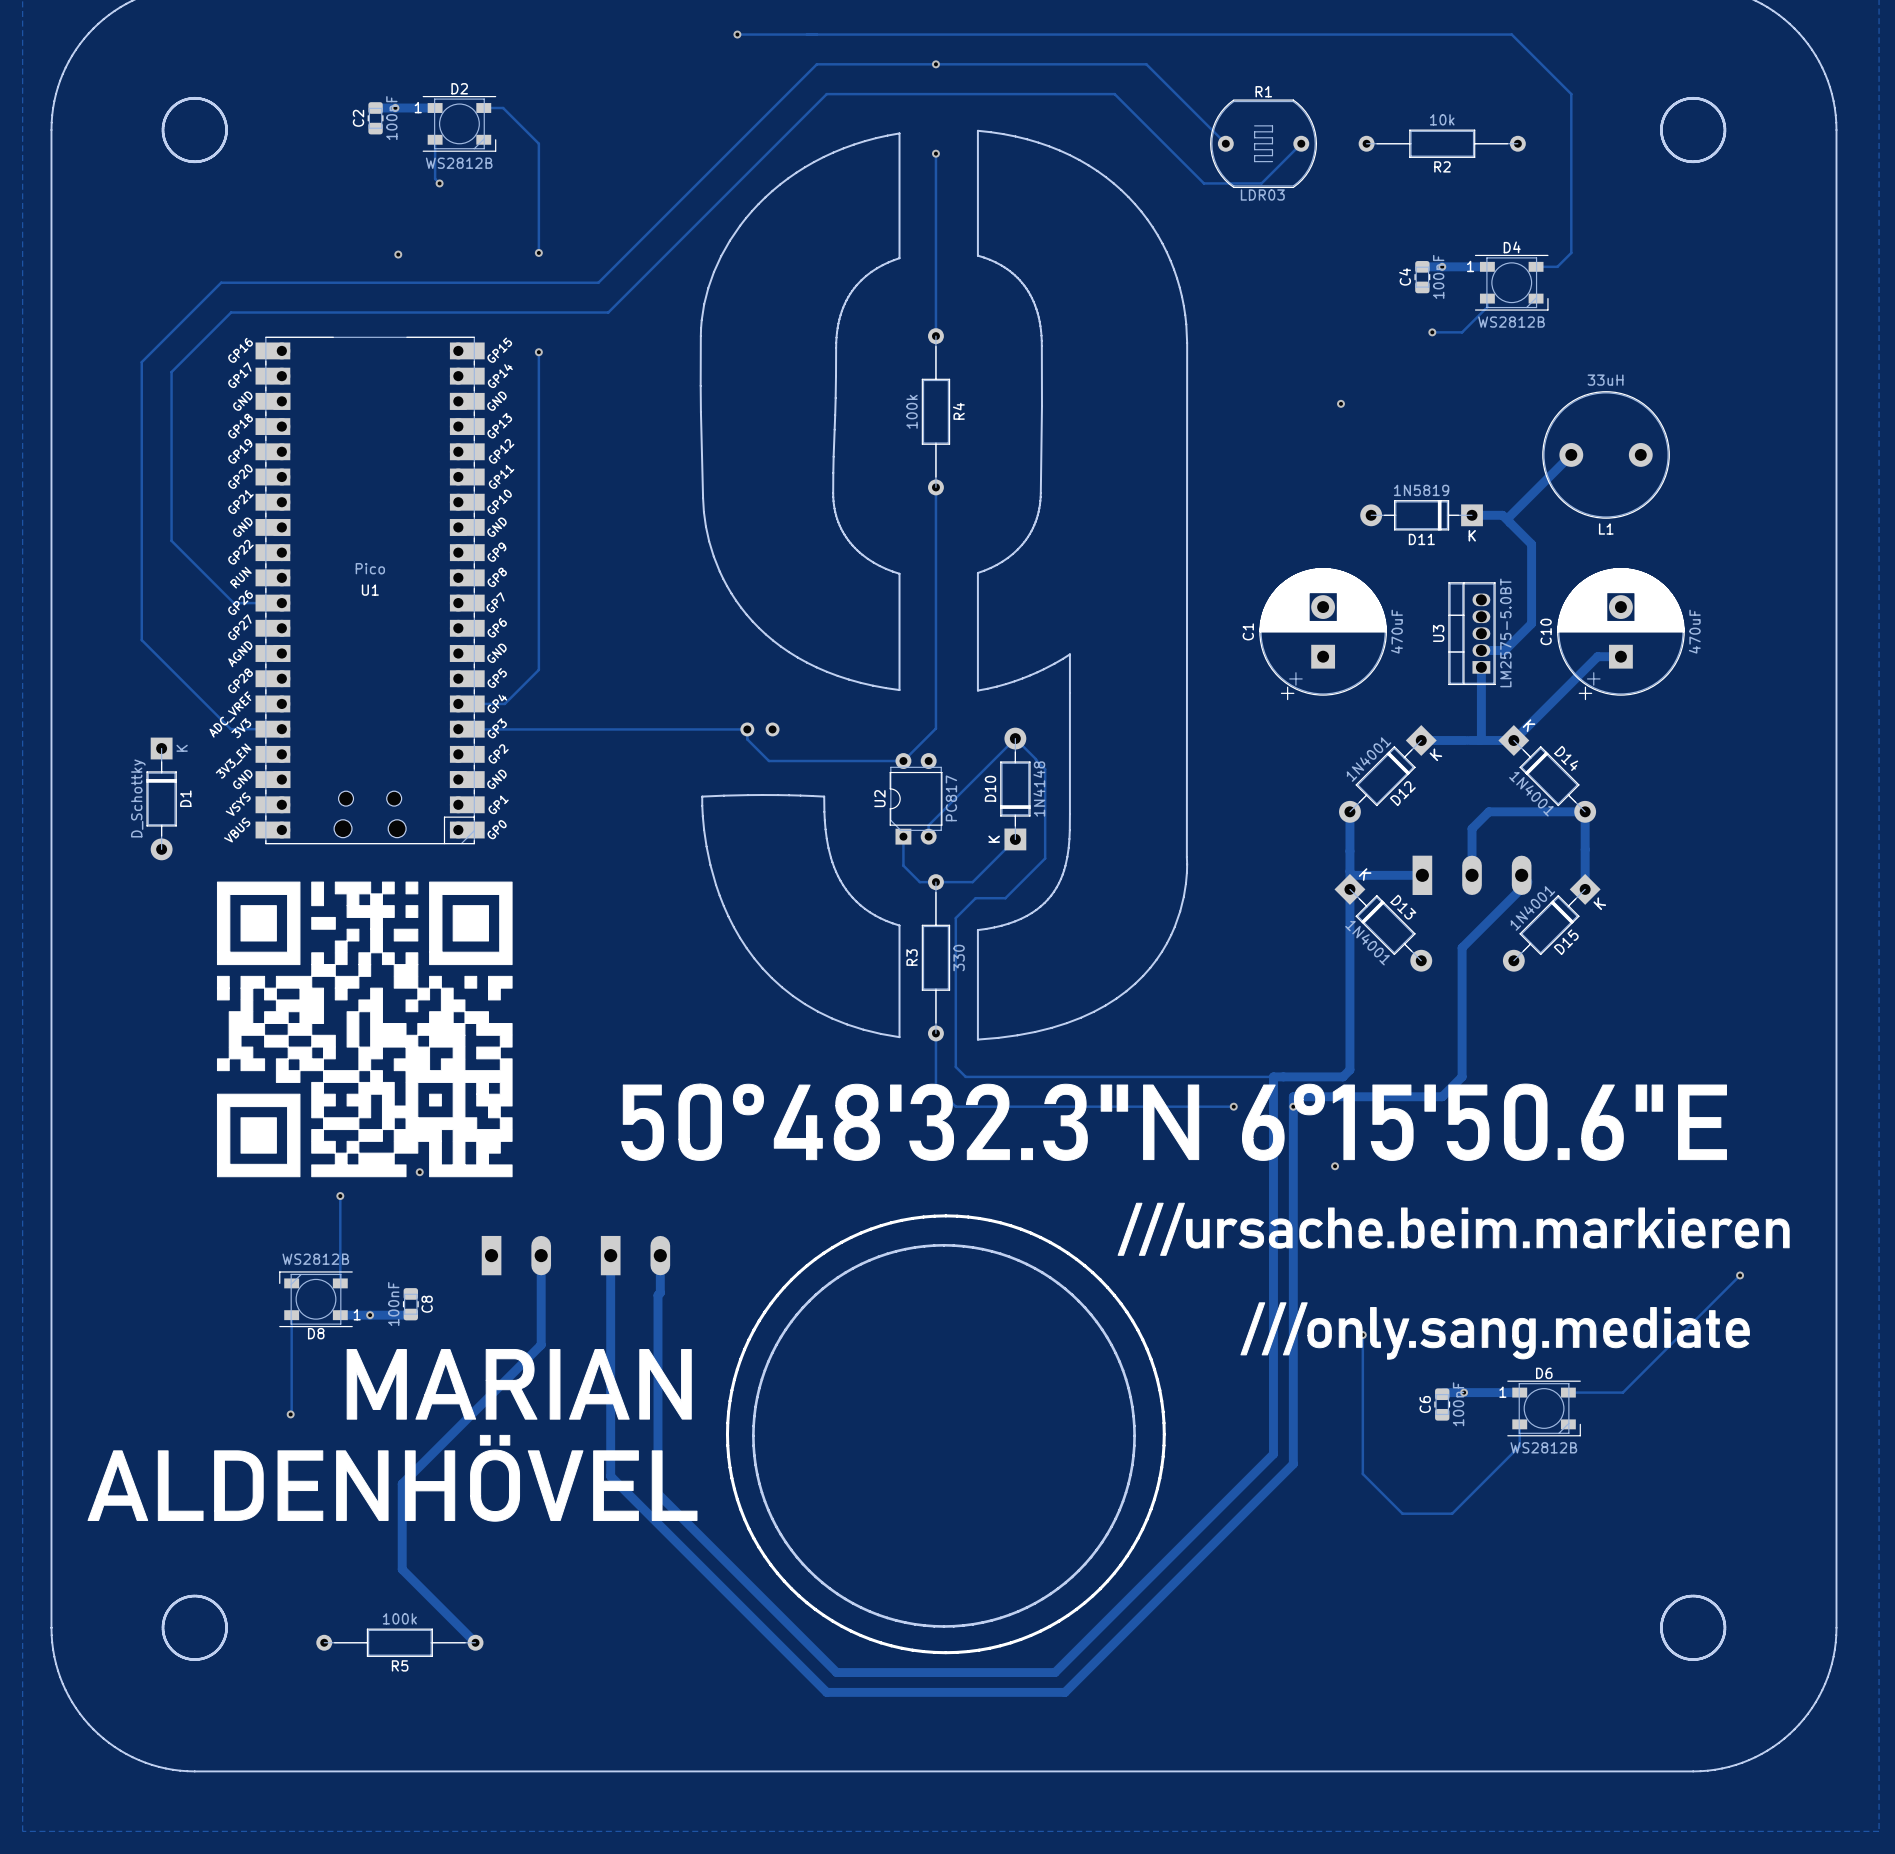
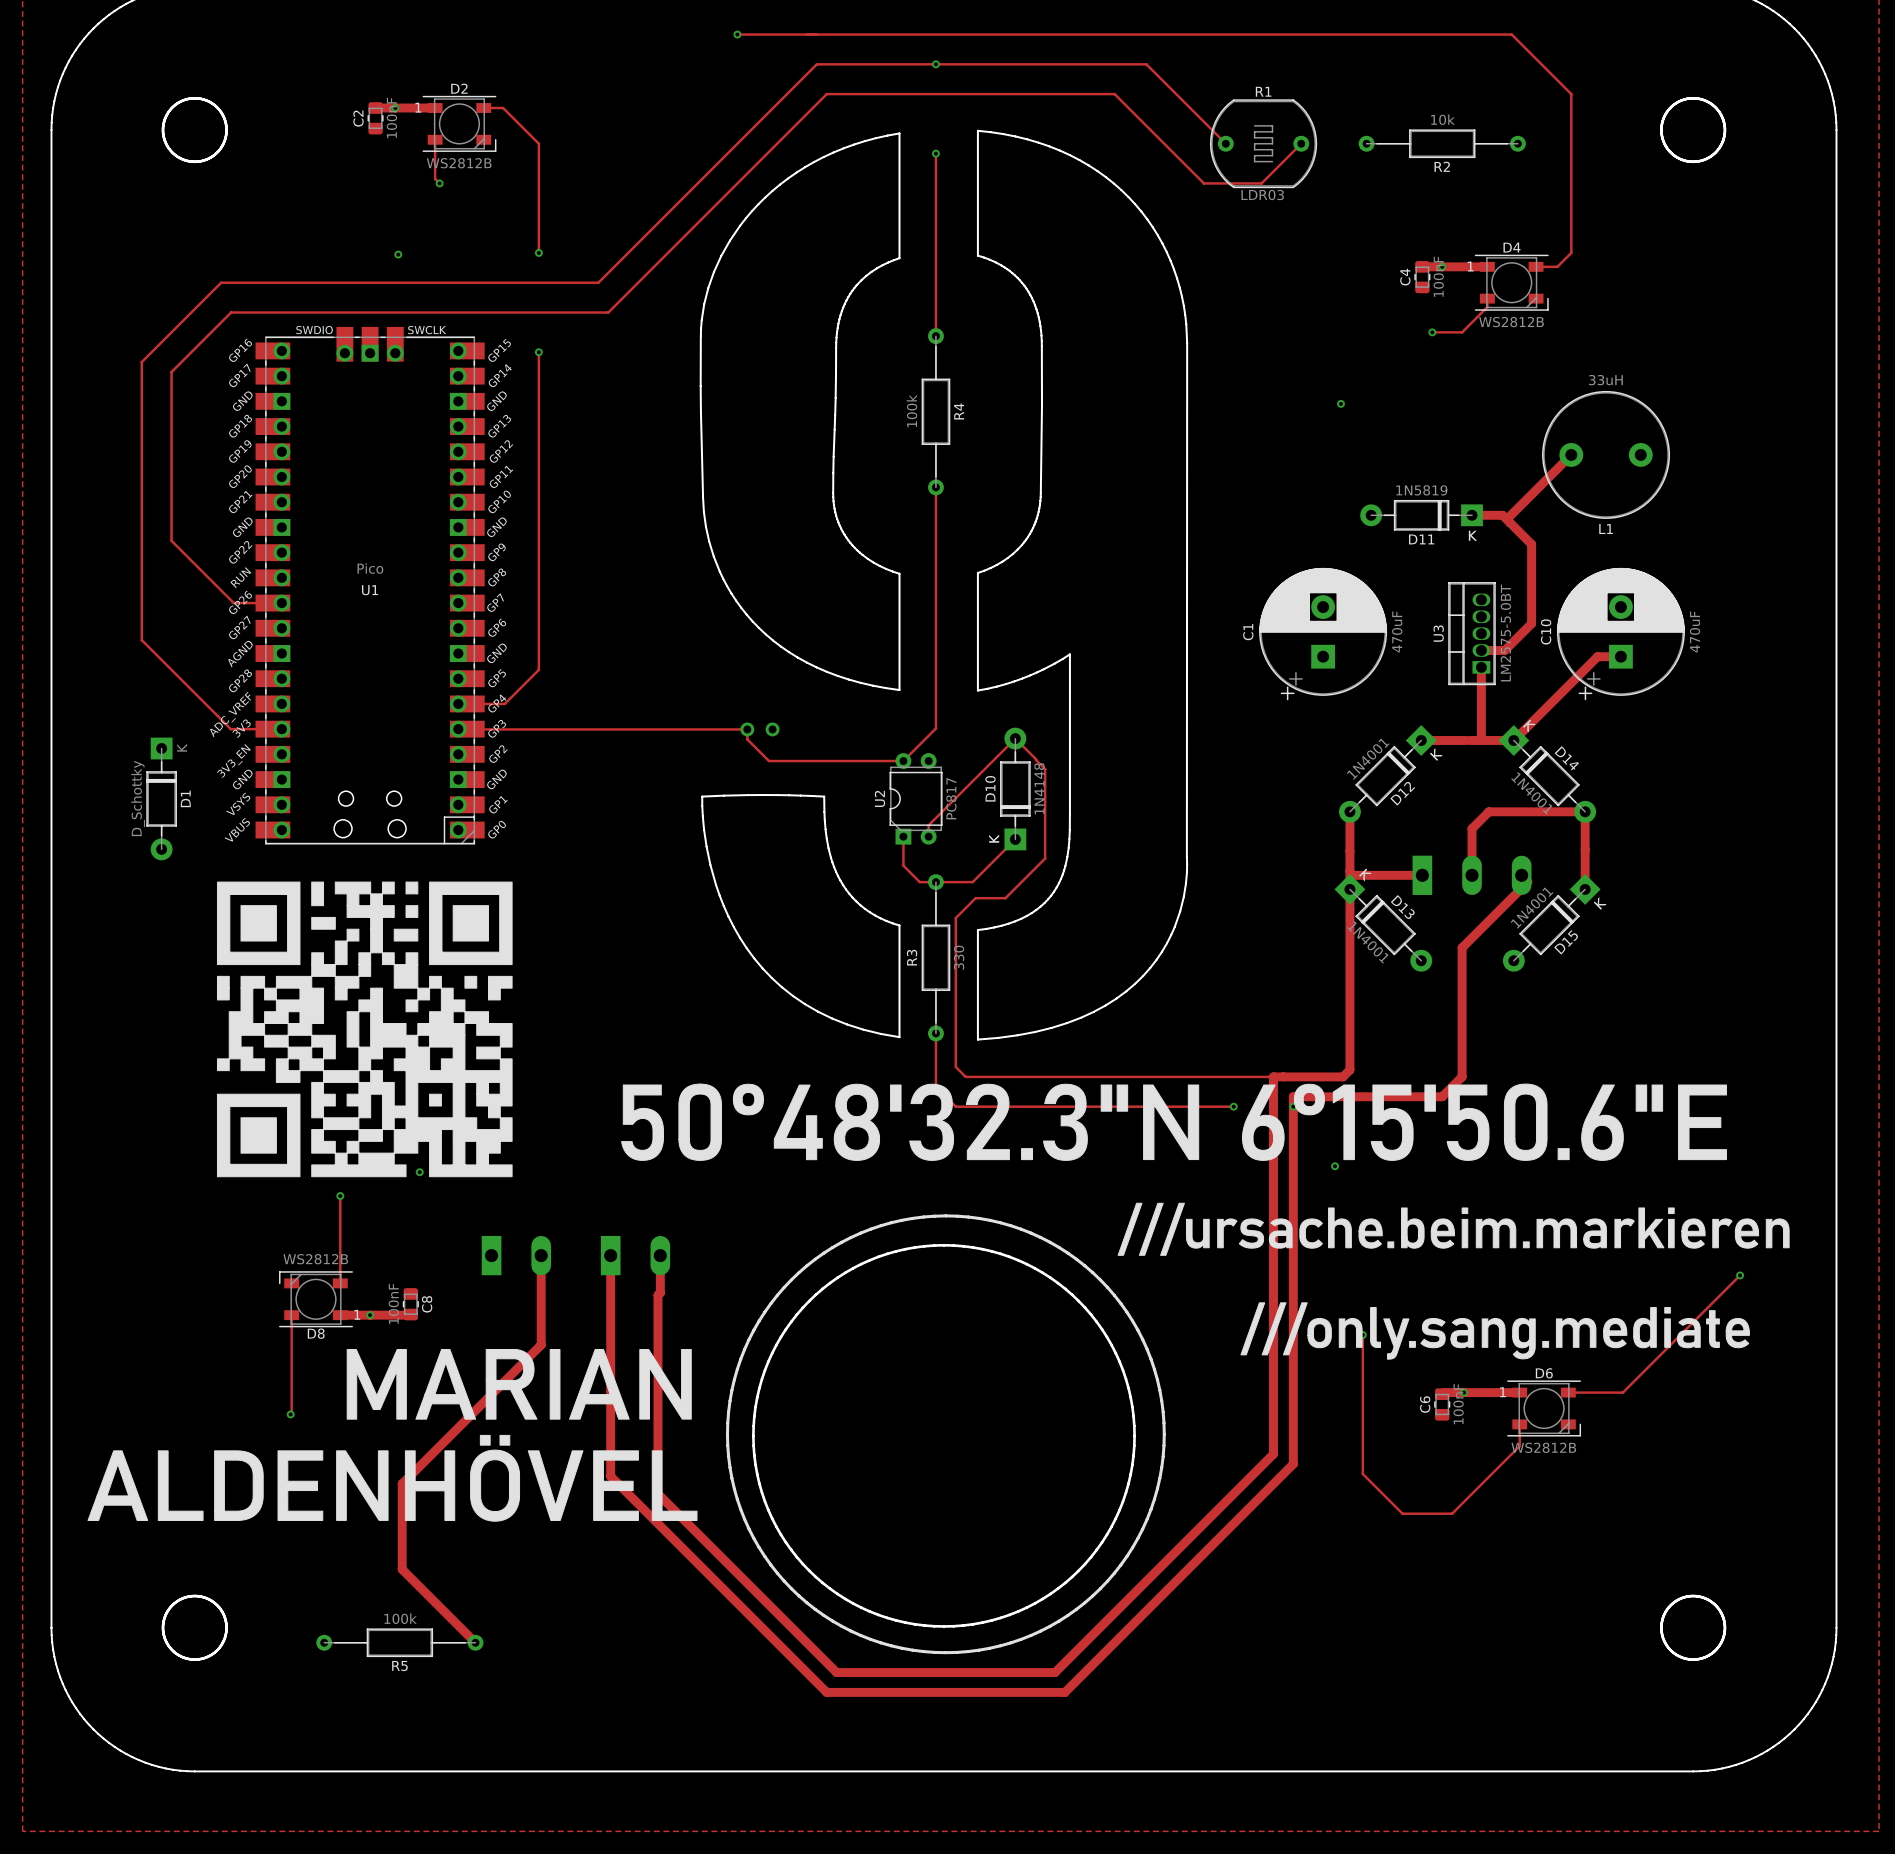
U1 footprint: [255, 336, 485, 845] -> [255, 326, 485, 845]

